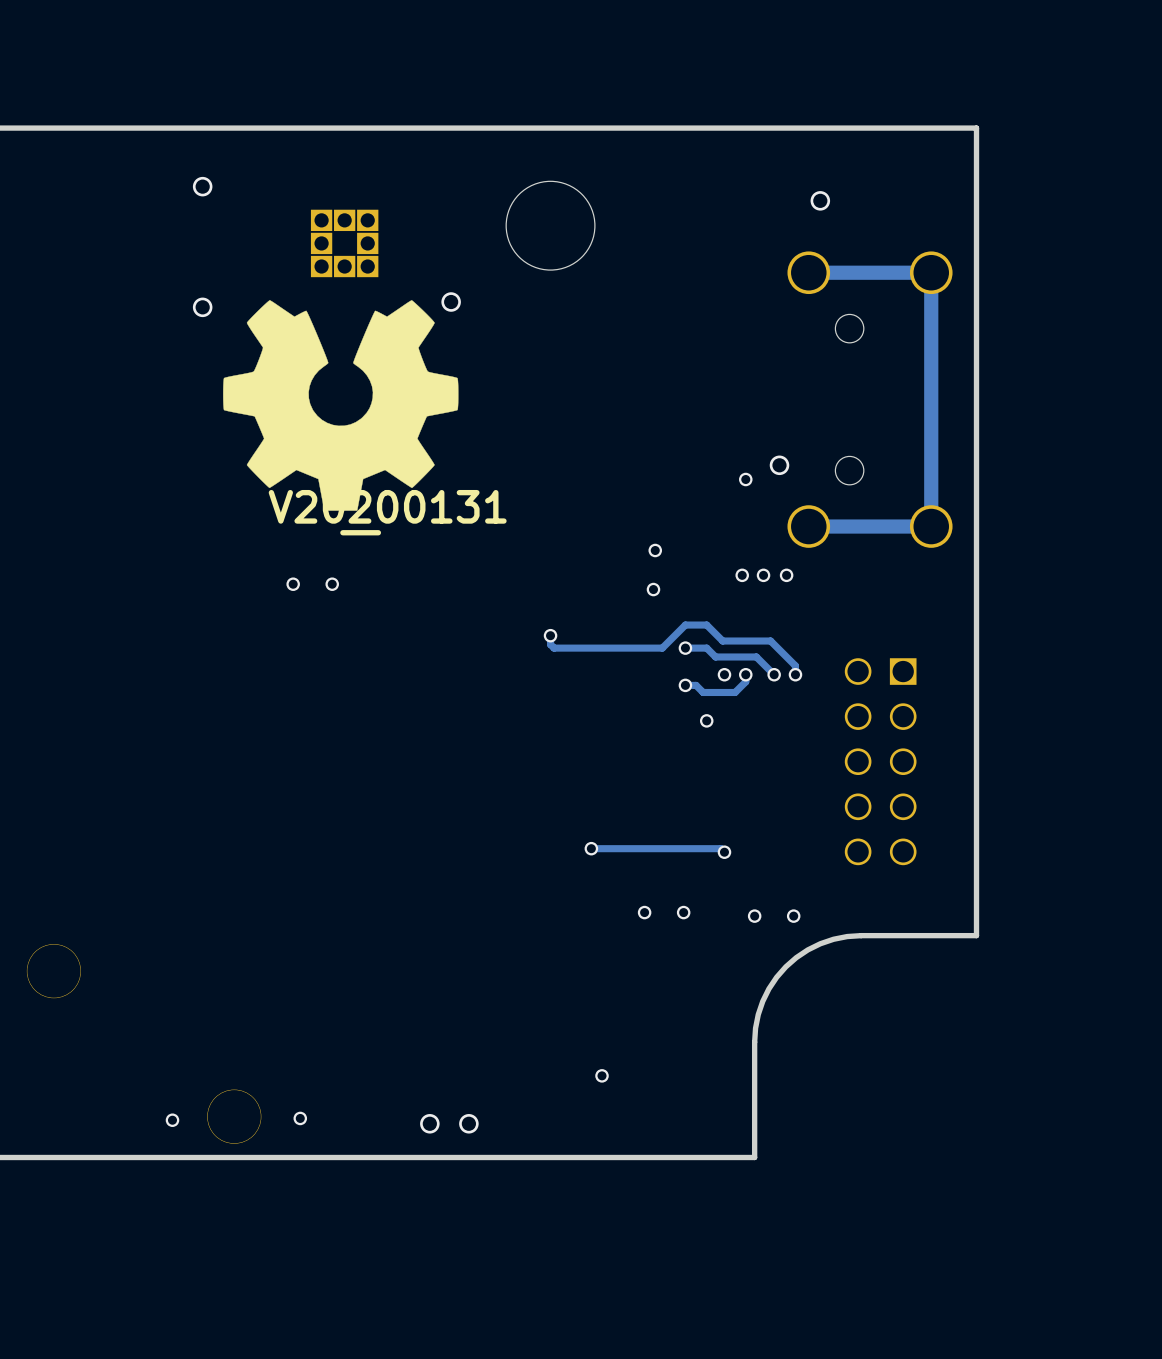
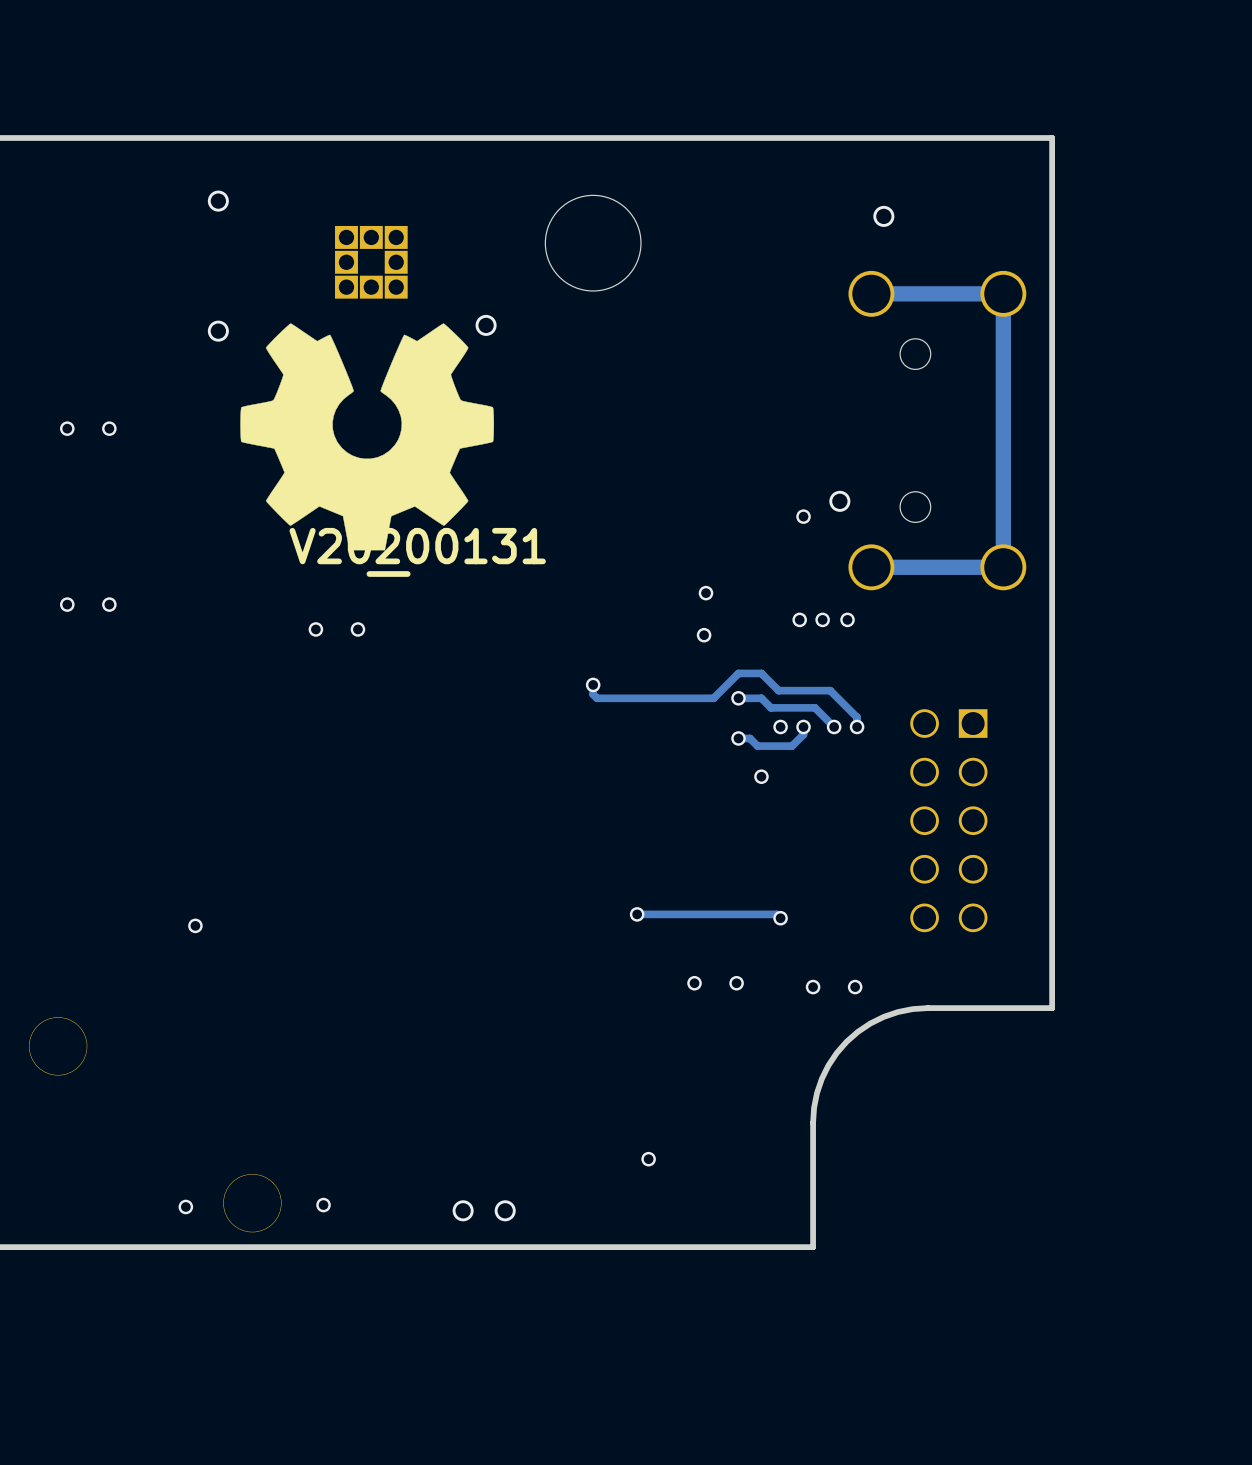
via: none -> (67, 428)
via: none -> (109, 428)
via: none -> (67, 604)
via: none -> (109, 604)
via: none -> (195, 925)

